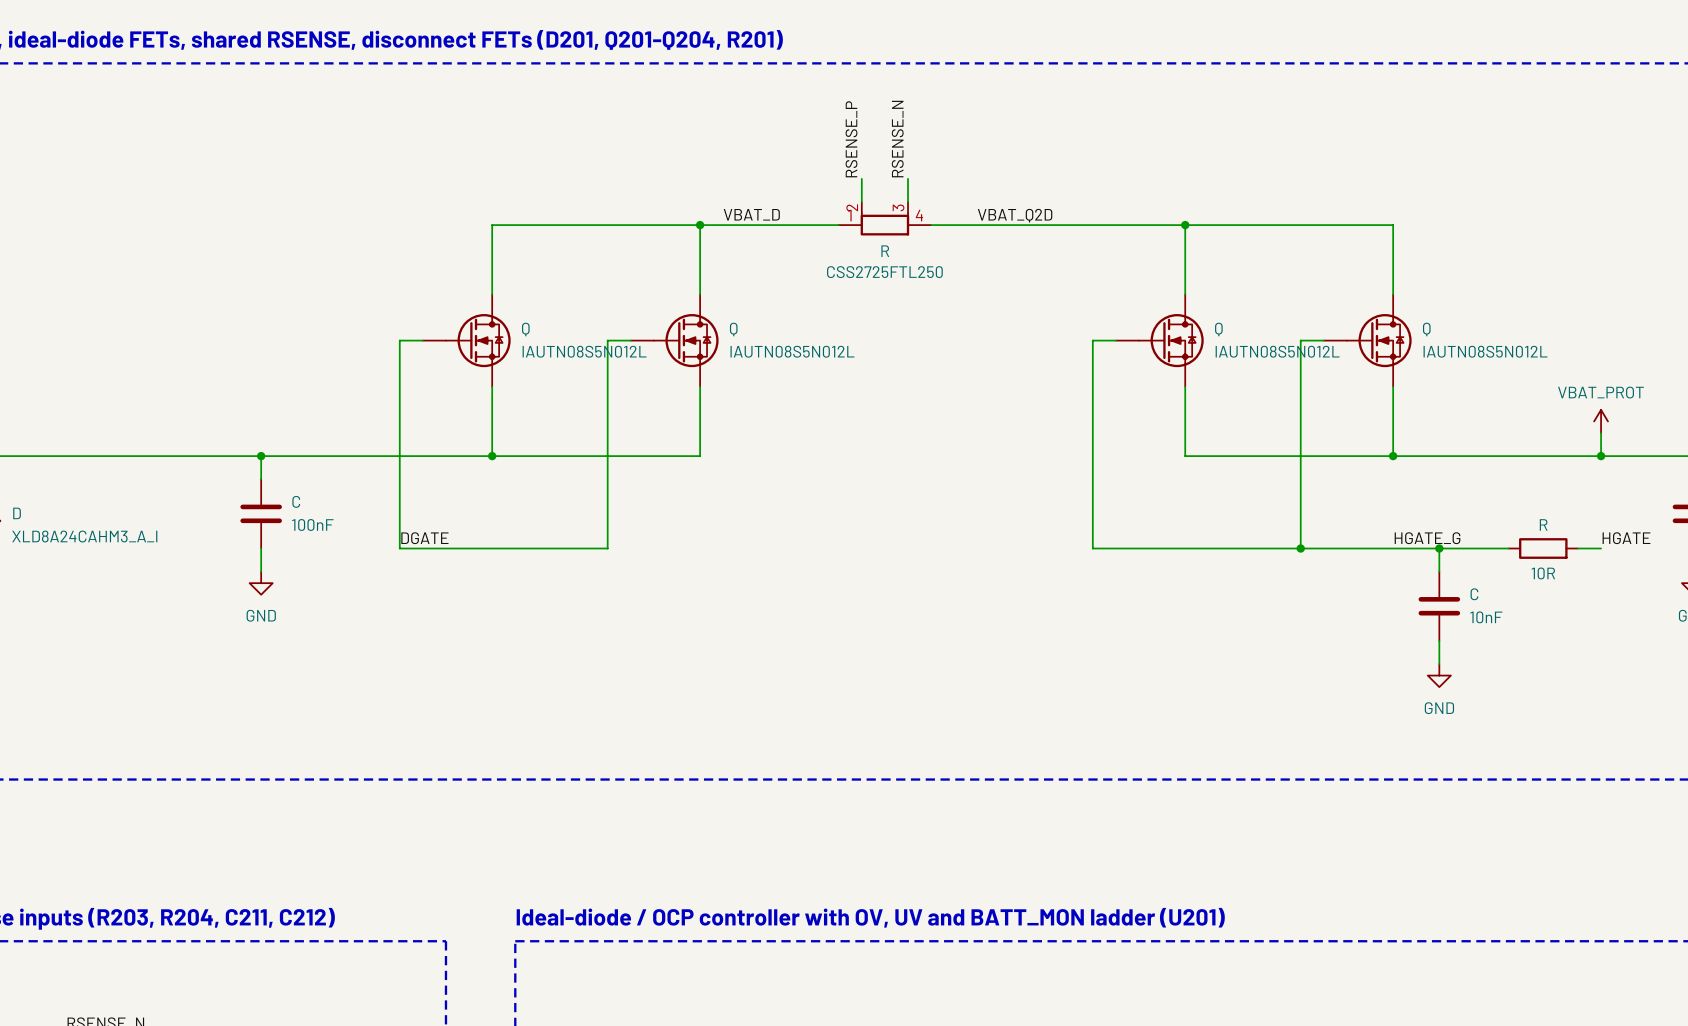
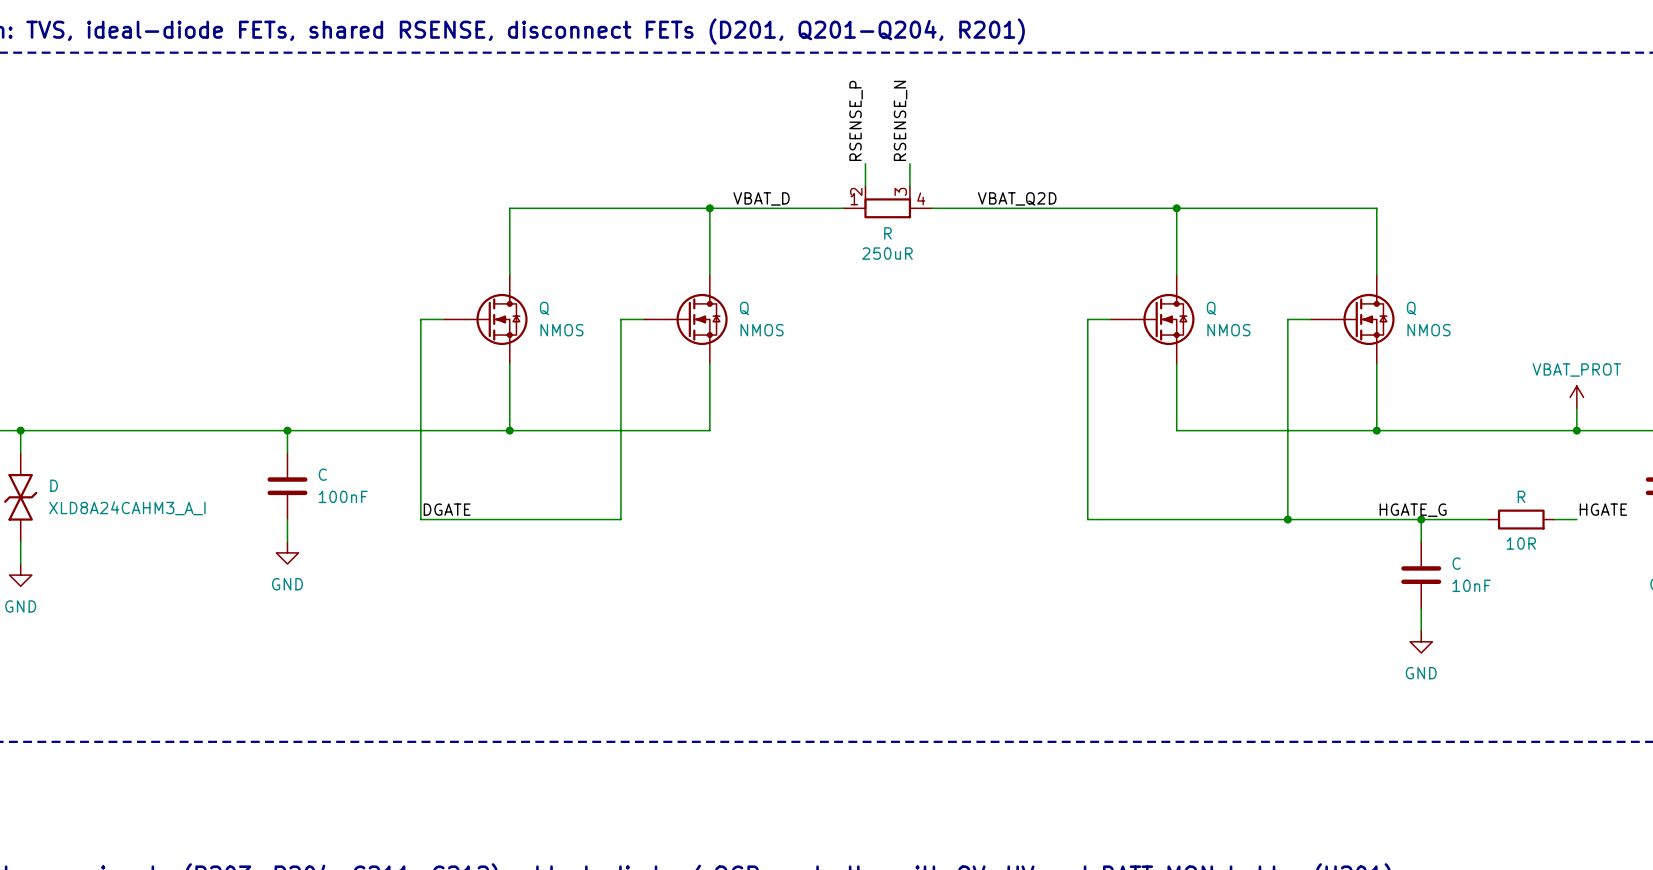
R value: CSS2725FTL250 (884, 272) -> 250uR (887, 253)
Q value: IAUTN08S5N012L (584, 351) -> NMOS (561, 330)
Q value: IAUTN08S5N012L (792, 351) -> NMOS (762, 330)
Q value: IAUTN08S5N012L (1277, 351) -> NMOS (1228, 330)
Q value: IAUTN08S5N012L (1485, 351) -> NMOS (1429, 330)

